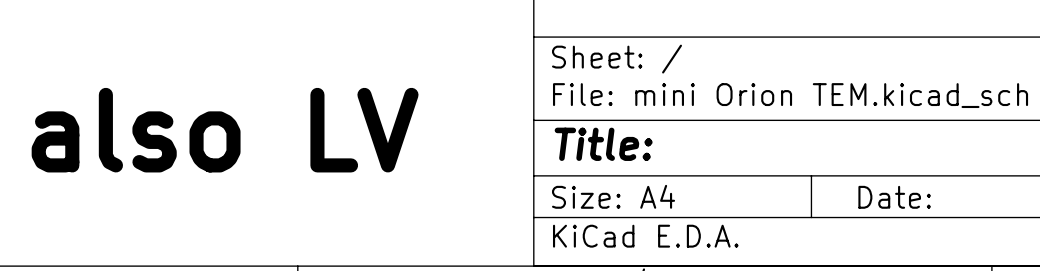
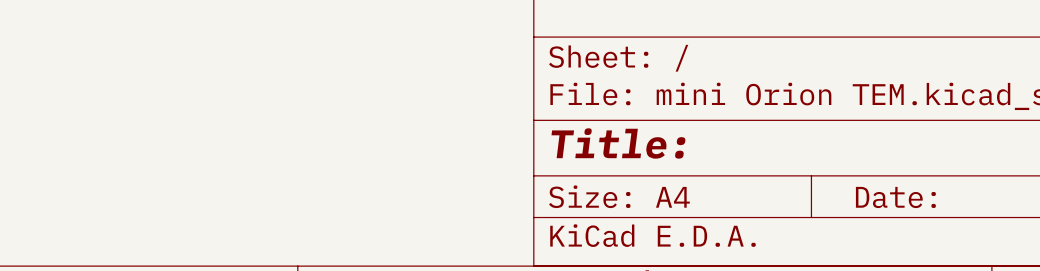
text: also LV (225, 130) -> none

